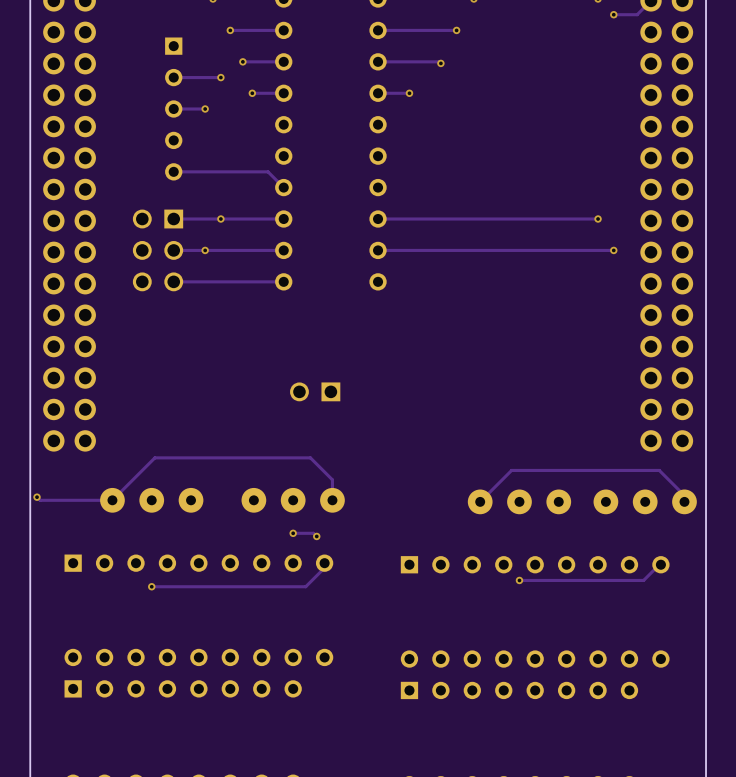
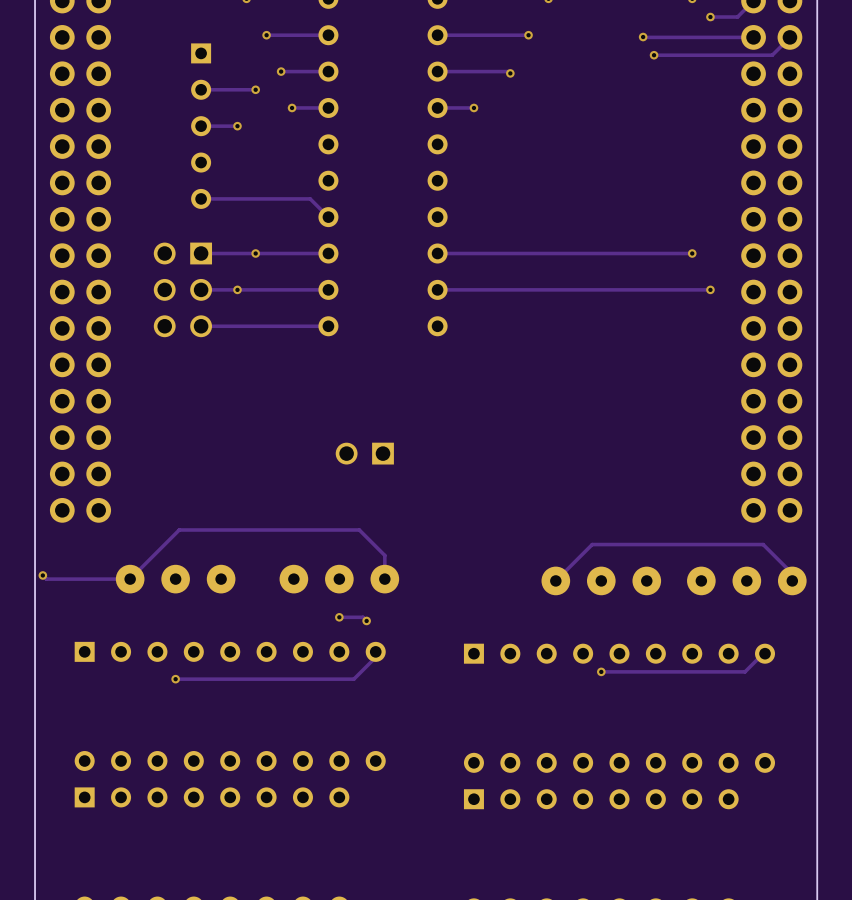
track: none -> (643, 37) (753, 37)
via: none -> (643, 37)
track: none -> (789, 37) (772, 55) (654, 55)
via: none -> (654, 55)

